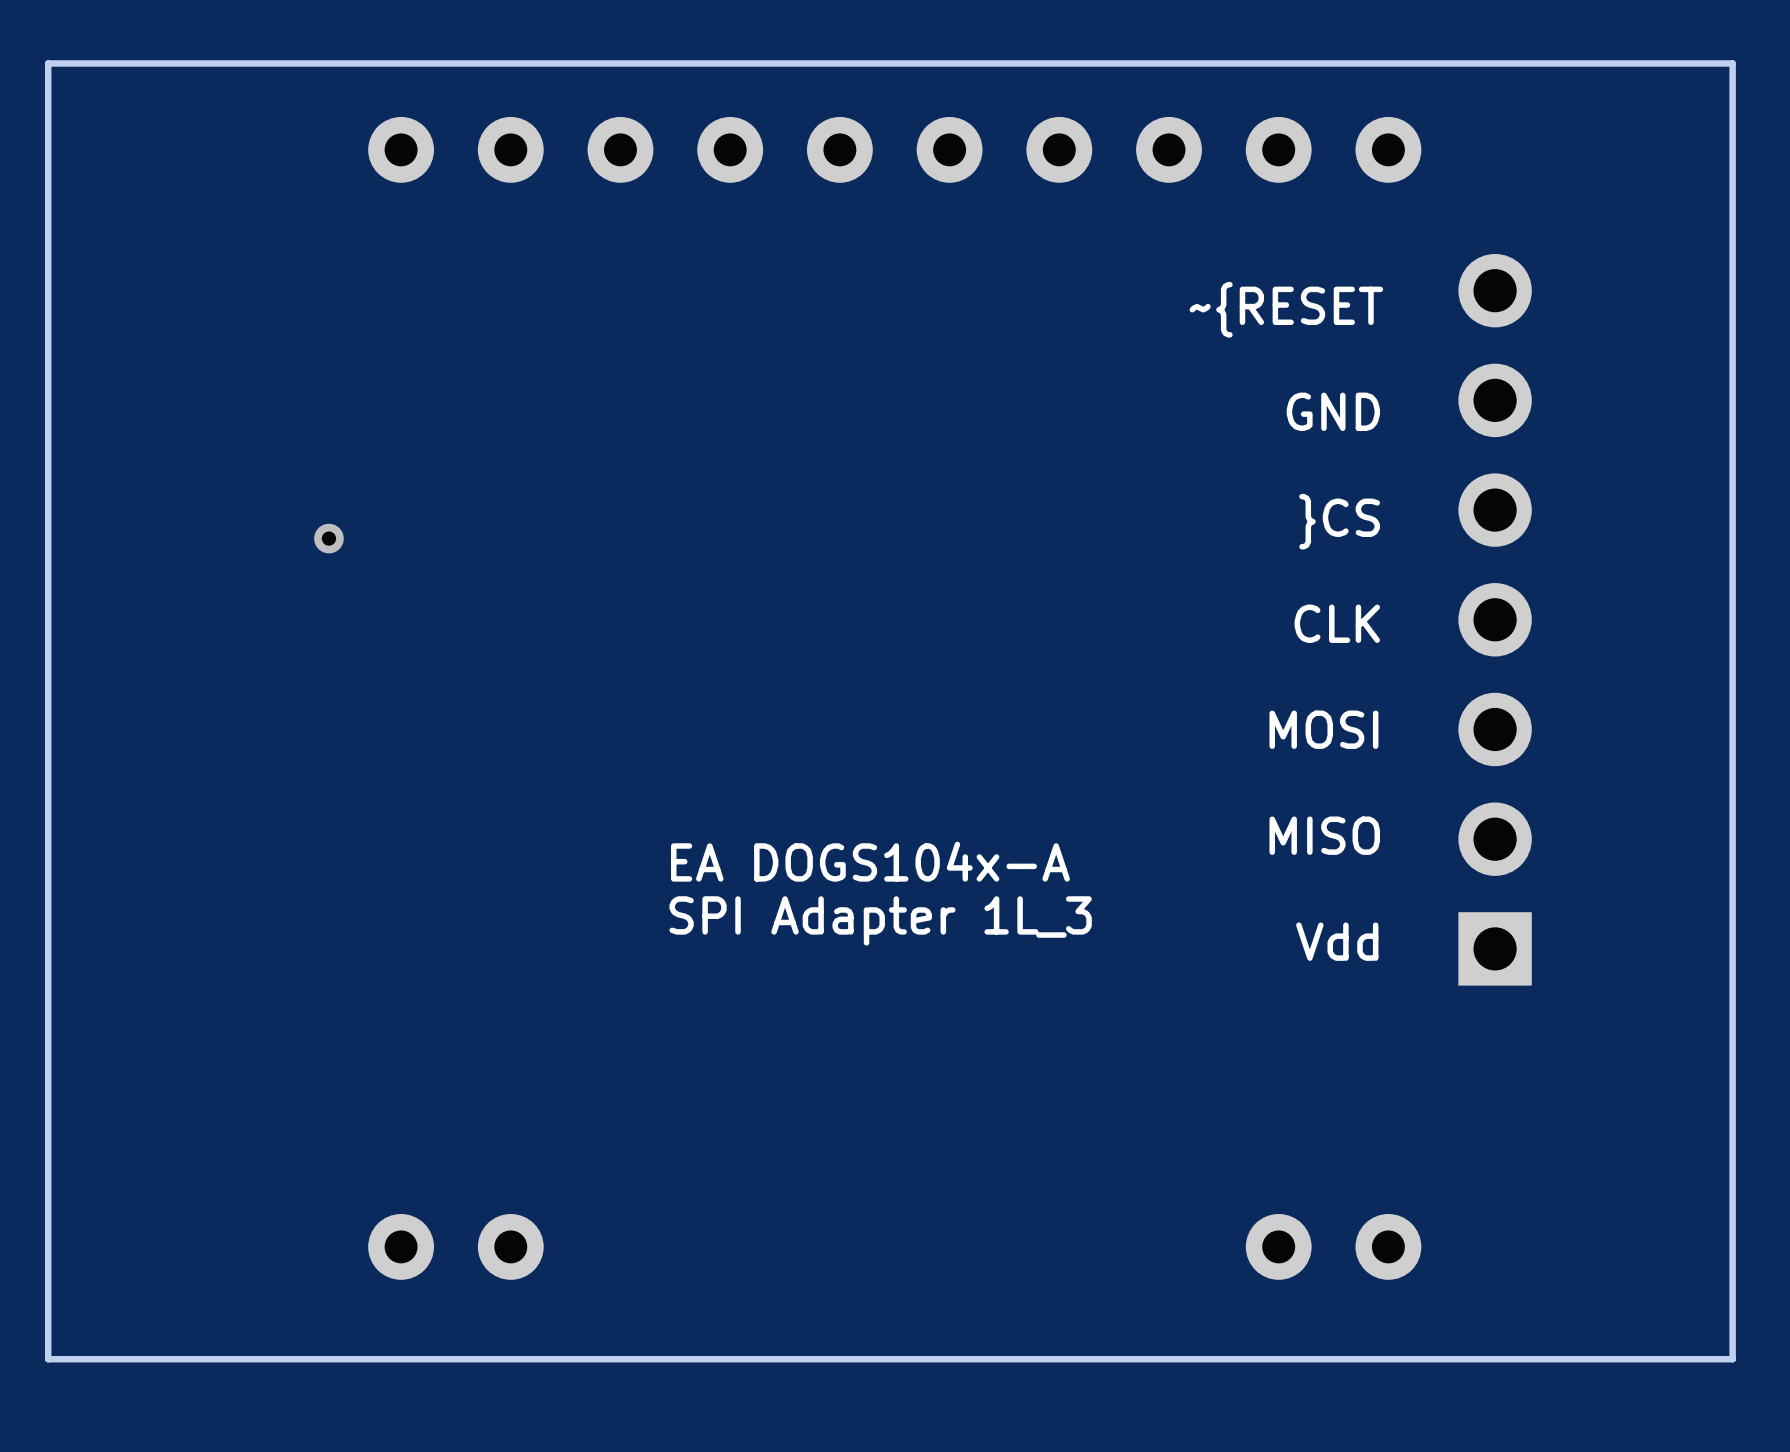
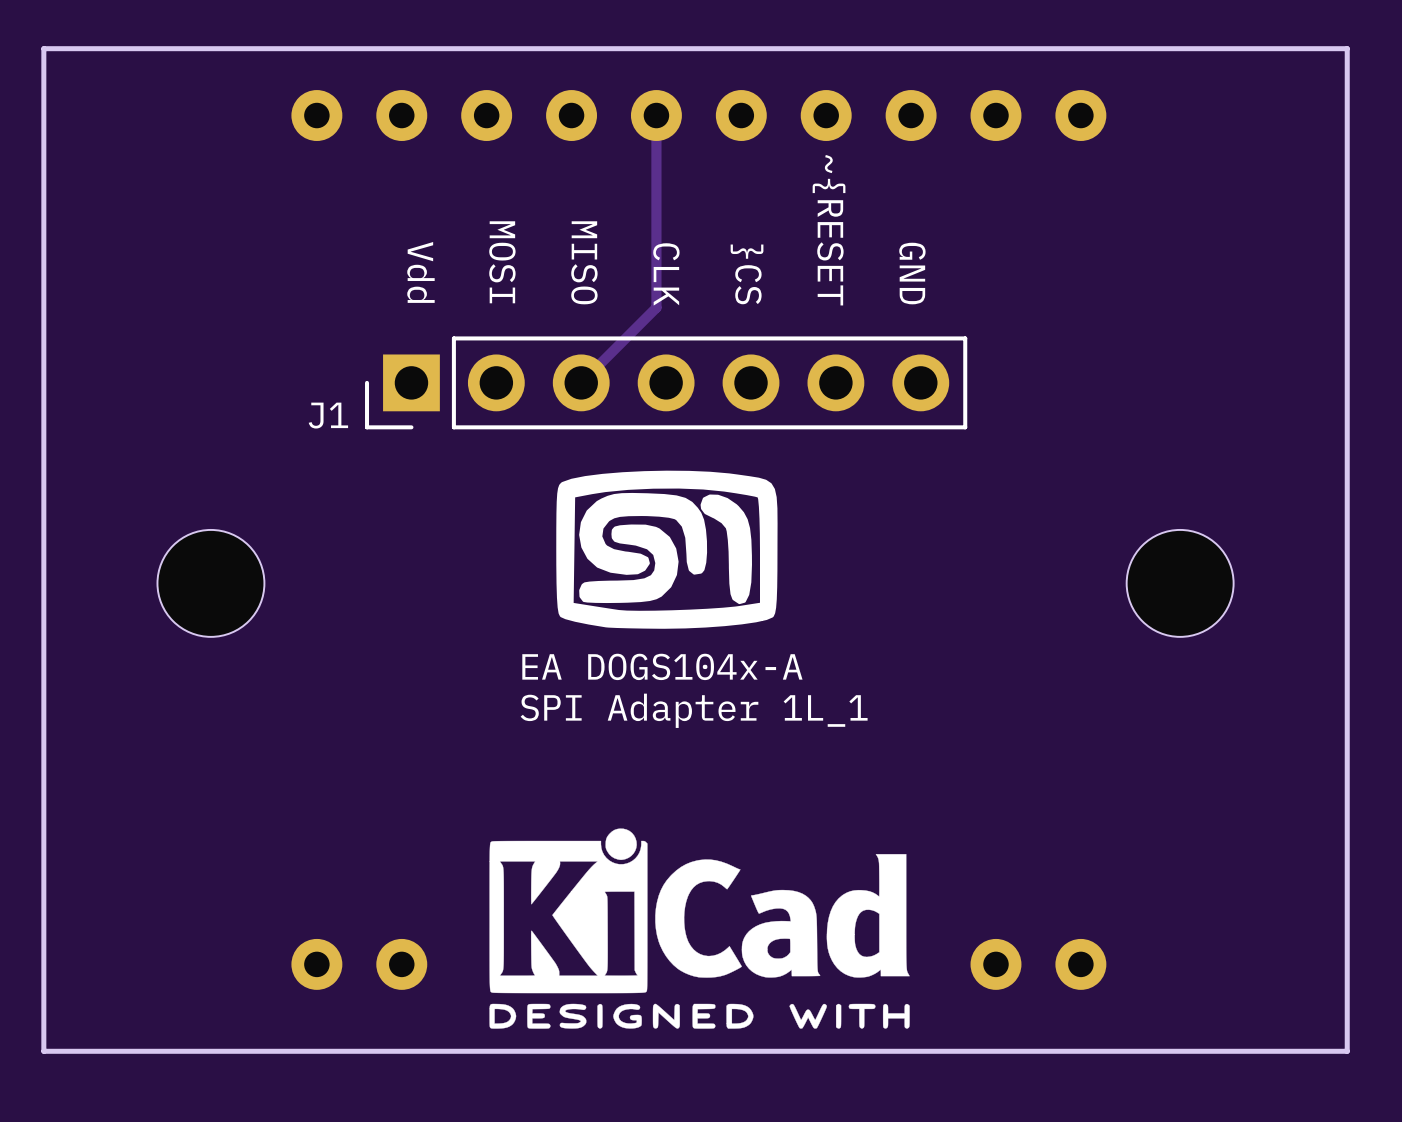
track: none -> (656, 115) (656, 307) (581, 382)
text rotation: 0° (1286, 309) -> 90° clockwise (829, 230)
text rotation: 0° (1333, 411) -> 90° clockwise (912, 273)
text position: GND (1333, 411) -> GND (912, 273)
J1: none -> (666, 382)
text rotation: 0° (1339, 521) -> 90° clockwise (747, 274)
text position: }CS (1339, 521) -> }CS (747, 274)
via: (328, 538) -> none
drawing: none -> [556, 470, 778, 629]
part: (1495, 619) -> none
text rotation: 0° (1337, 623) -> 90° clockwise (666, 274)
text position: CLK (1337, 623) -> CLK (666, 274)
text rotation: 0° (1323, 729) -> 90° clockwise (502, 262)
text position: MOSI (1323, 729) -> MOSI (502, 262)
part: none -> (210, 583)
part: none -> (1180, 583)
text rotation: 0° (1324, 835) -> 90° clockwise (584, 262)
text position: MISO (1324, 835) -> MISO (584, 262)
text: SPI Adapter 1L_3 (880, 920) -> SPI Adapter 1L_1 (694, 710)
text rotation: 0° (1337, 941) -> 90° clockwise (420, 272)
text position: Vdd (1337, 941) -> Vdd (420, 272)
drawing: none -> [489, 828, 910, 1029]

